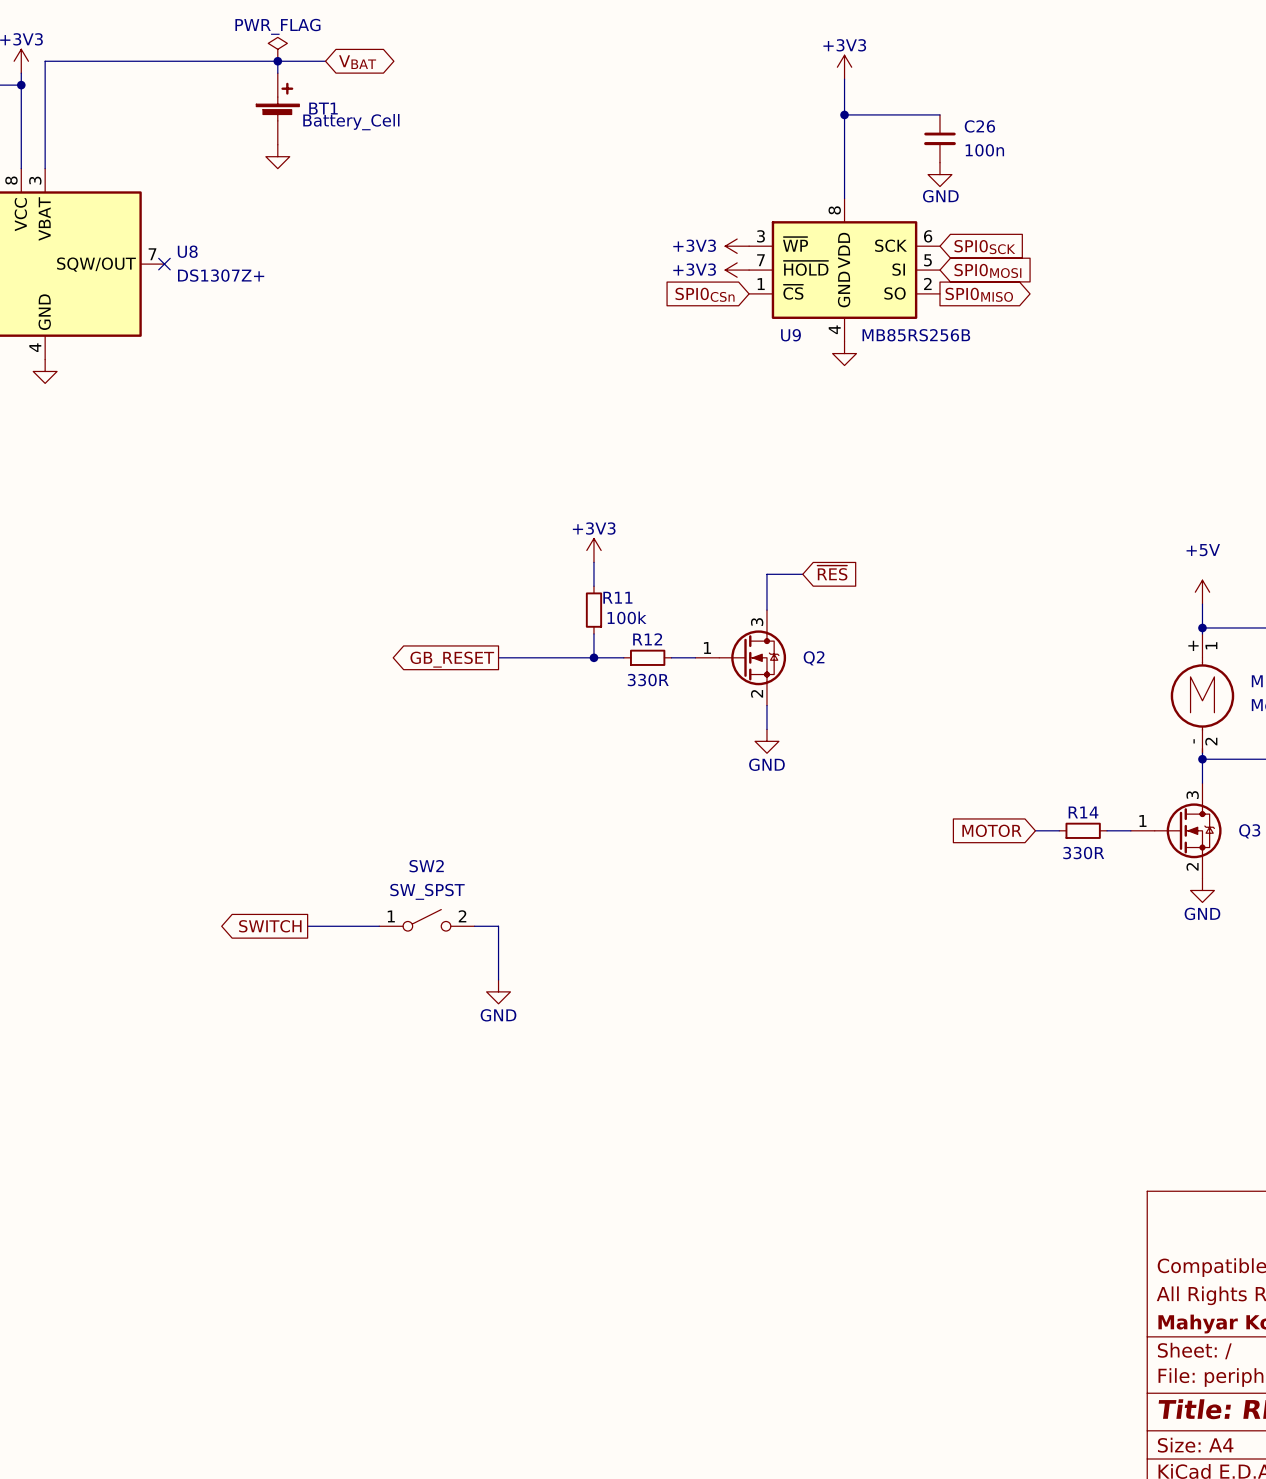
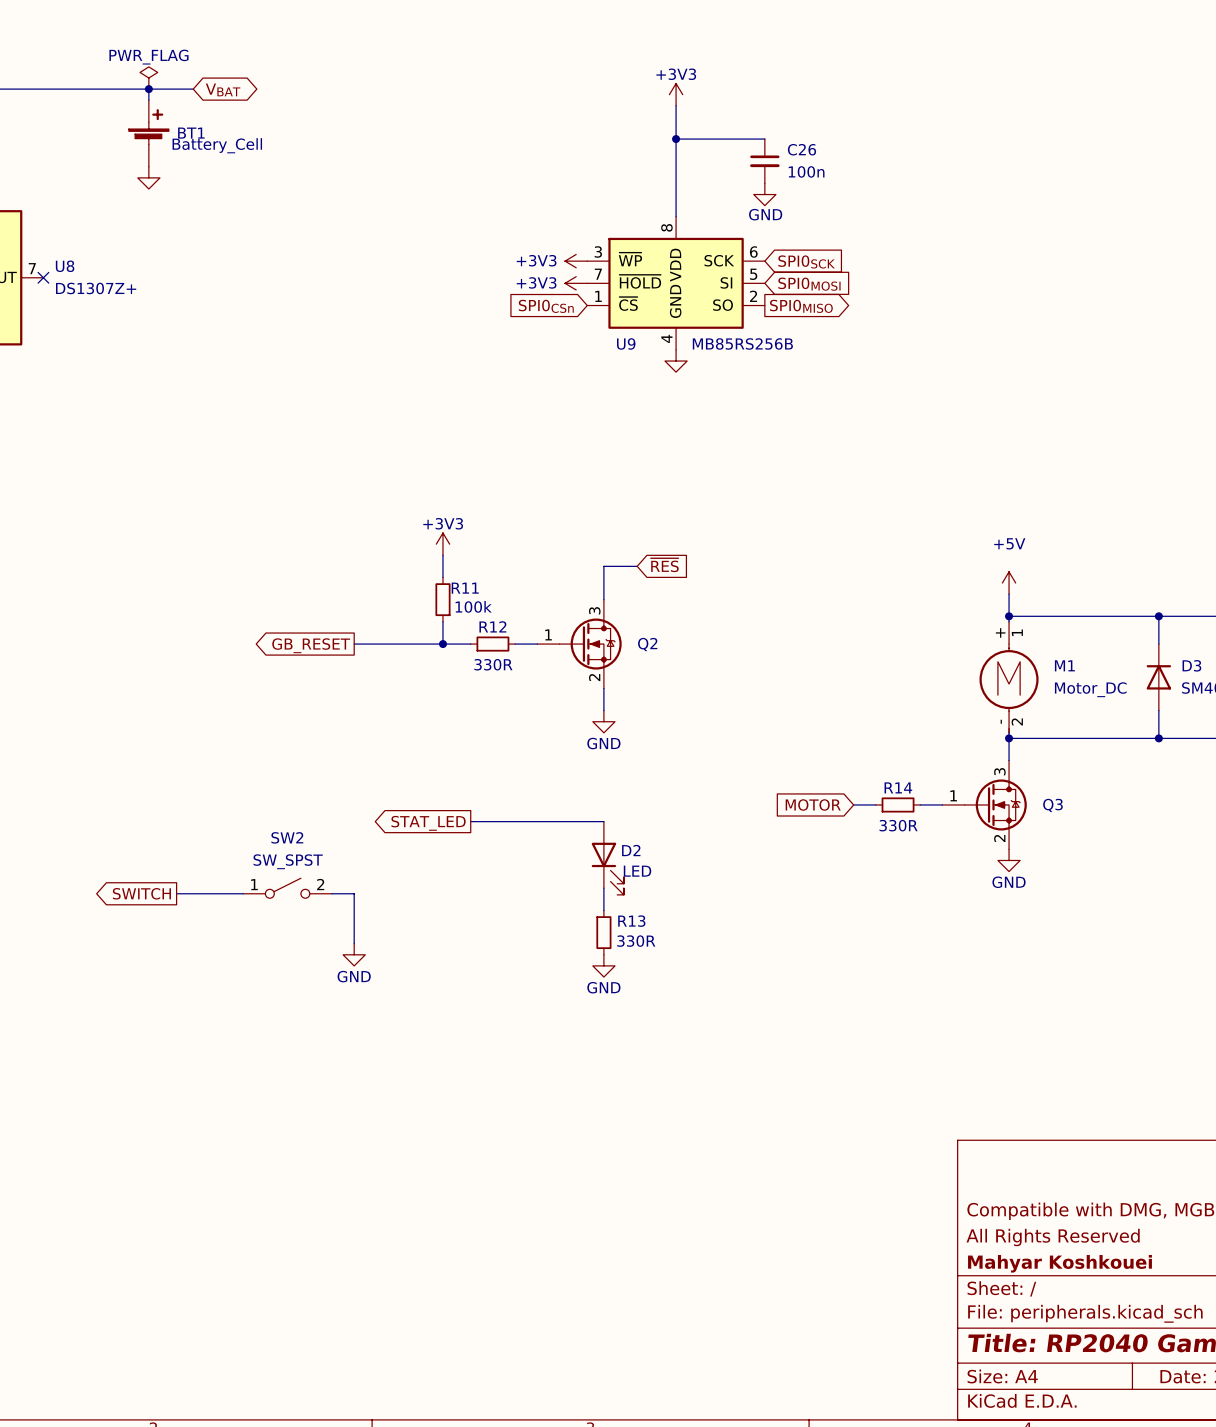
wire: none -> (470, 821) (603, 821)
global label: none -> STAT_LED (428, 823)
D2: none -> LED (607, 858)
wire: none -> (603, 888) (603, 910)
R13: none -> 330R (603, 932)
power symbol: none -> GND (603, 965)

